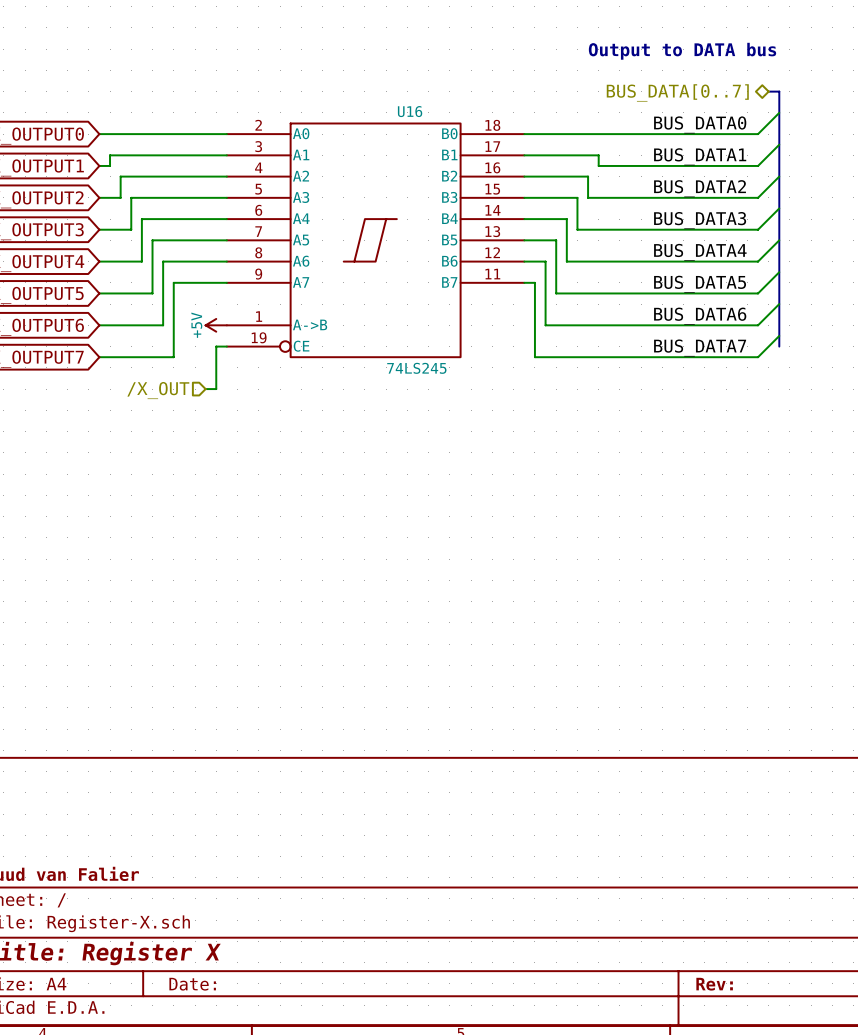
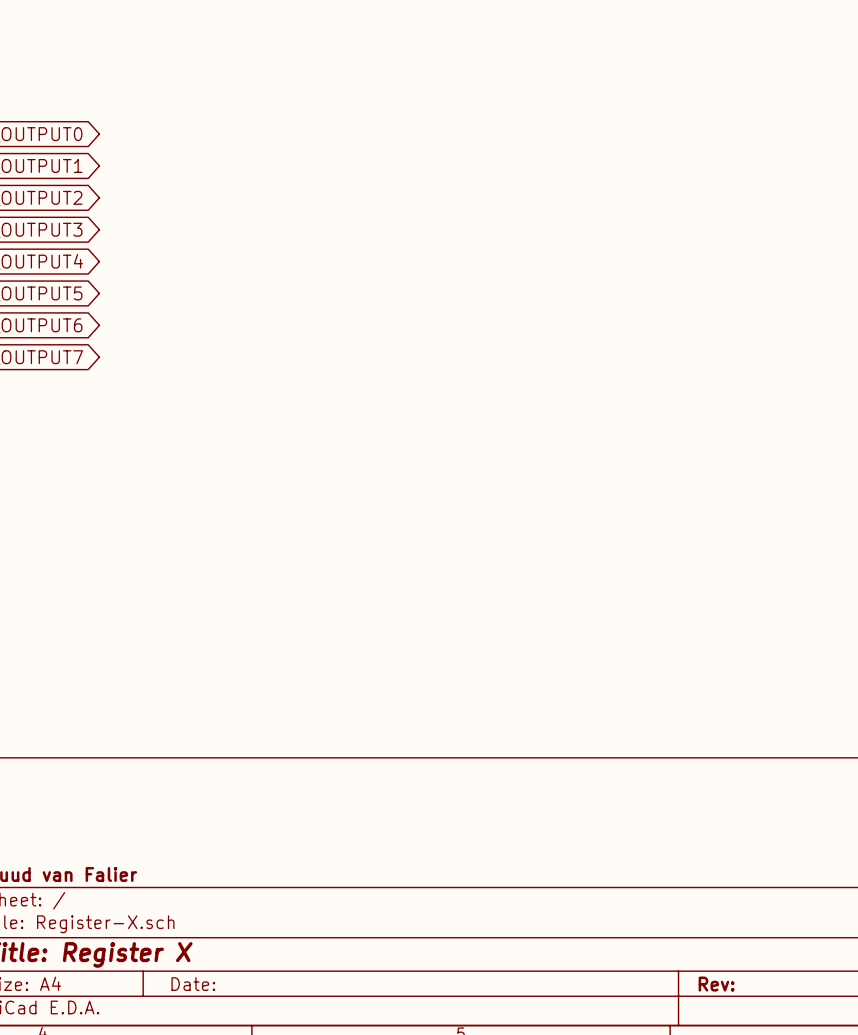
text: Output to DATA bus (682, 51) -> none
bus: (768, 91) (779, 91) (779, 346) -> none
hierarchical label: BUS_DATA[0..7] (677, 92) -> none
wire: (779, 112) (758, 134) (524, 134) -> none
label: BUS_DATA0 (700, 124) -> none
wire: (99, 134) (226, 134) -> none
wire: (779, 144) (758, 165) (598, 165) (598, 155) (524, 155) -> none
wire: (226, 155) (110, 155) (110, 165) (99, 165) -> none
label: BUS_DATA1 (700, 156) -> none
wire: (226, 176) (120, 176) (120, 197) (99, 197) -> none
wire: (524, 176) (588, 176) (588, 197) (758, 197) (779, 176) -> none
label: BUS_DATA2 (700, 188) -> none
wire: (226, 197) (131, 197) (131, 229) (99, 229) -> none
wire: (524, 197) (577, 197) (577, 229) (758, 229) (779, 208) -> none
wire: (226, 219) (141, 219) (141, 261) (99, 261) -> none
wire: (524, 219) (566, 219) (566, 261) (758, 261) (779, 240) -> none
label: BUS_DATA3 (700, 220) -> none
wire: (226, 240) (152, 240) (152, 293) (99, 293) -> none
U16: 74LS245 (375, 240) -> none
wire: (524, 240) (556, 240) (556, 293) (758, 293) (779, 272) -> none
label: BUS_DATA4 (700, 252) -> none
wire: (226, 261) (163, 261) (163, 325) (99, 325) -> none
wire: (524, 261) (545, 261) (545, 325) (758, 325) (779, 304) -> none
wire: (226, 282) (173, 282) (173, 357) (99, 357) -> none
wire: (524, 282) (534, 282) (534, 357) (758, 357) (779, 335) -> none
label: BUS_DATA5 (700, 284) -> none
label: BUS_DATA6 (700, 316) -> none
power symbol: +5V (216, 325) -> none
wire: (226, 346) (216, 346) (216, 389) (205, 389) -> none
label: BUS_DATA7 (700, 348) -> none
hierarchical label: /X_OUT (158, 390) -> none

